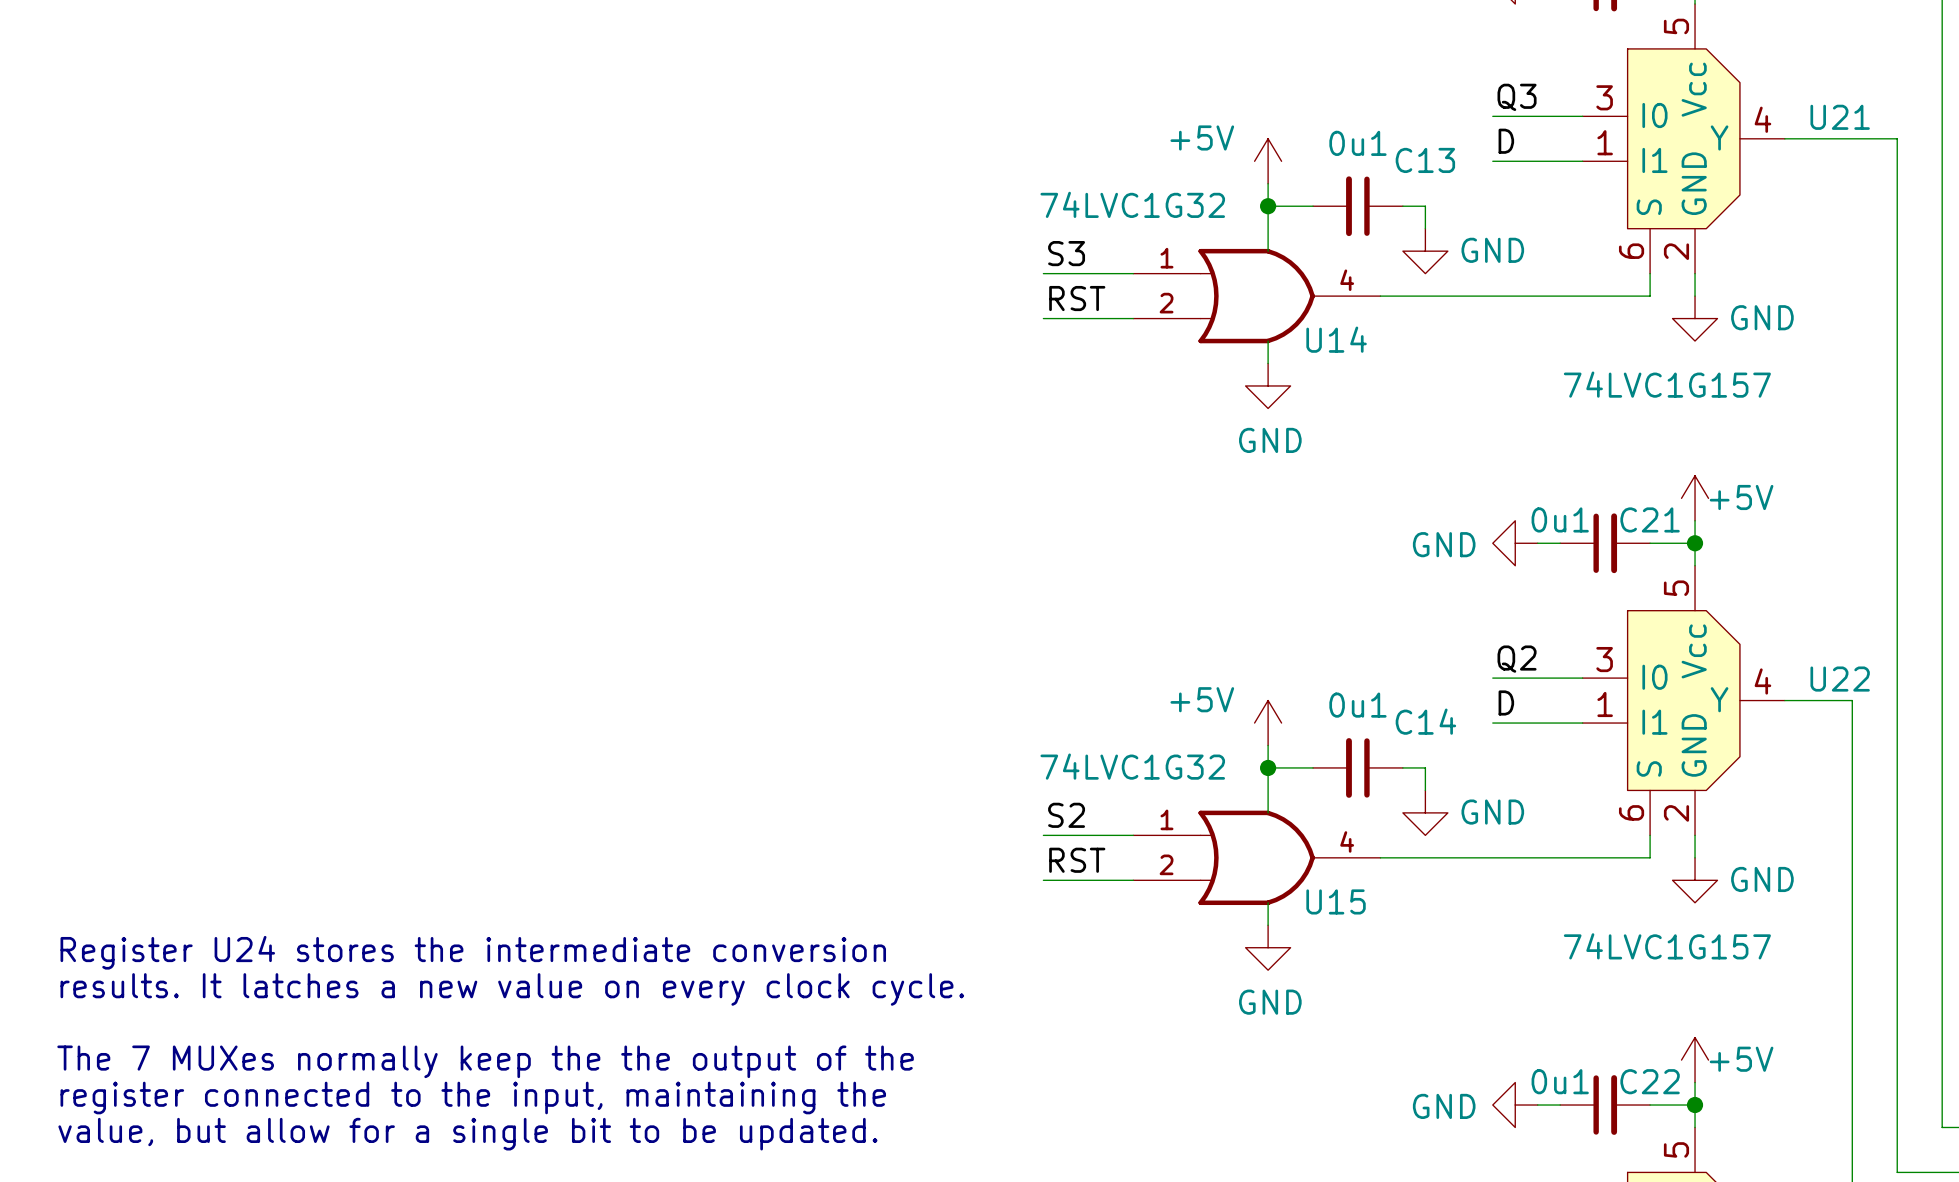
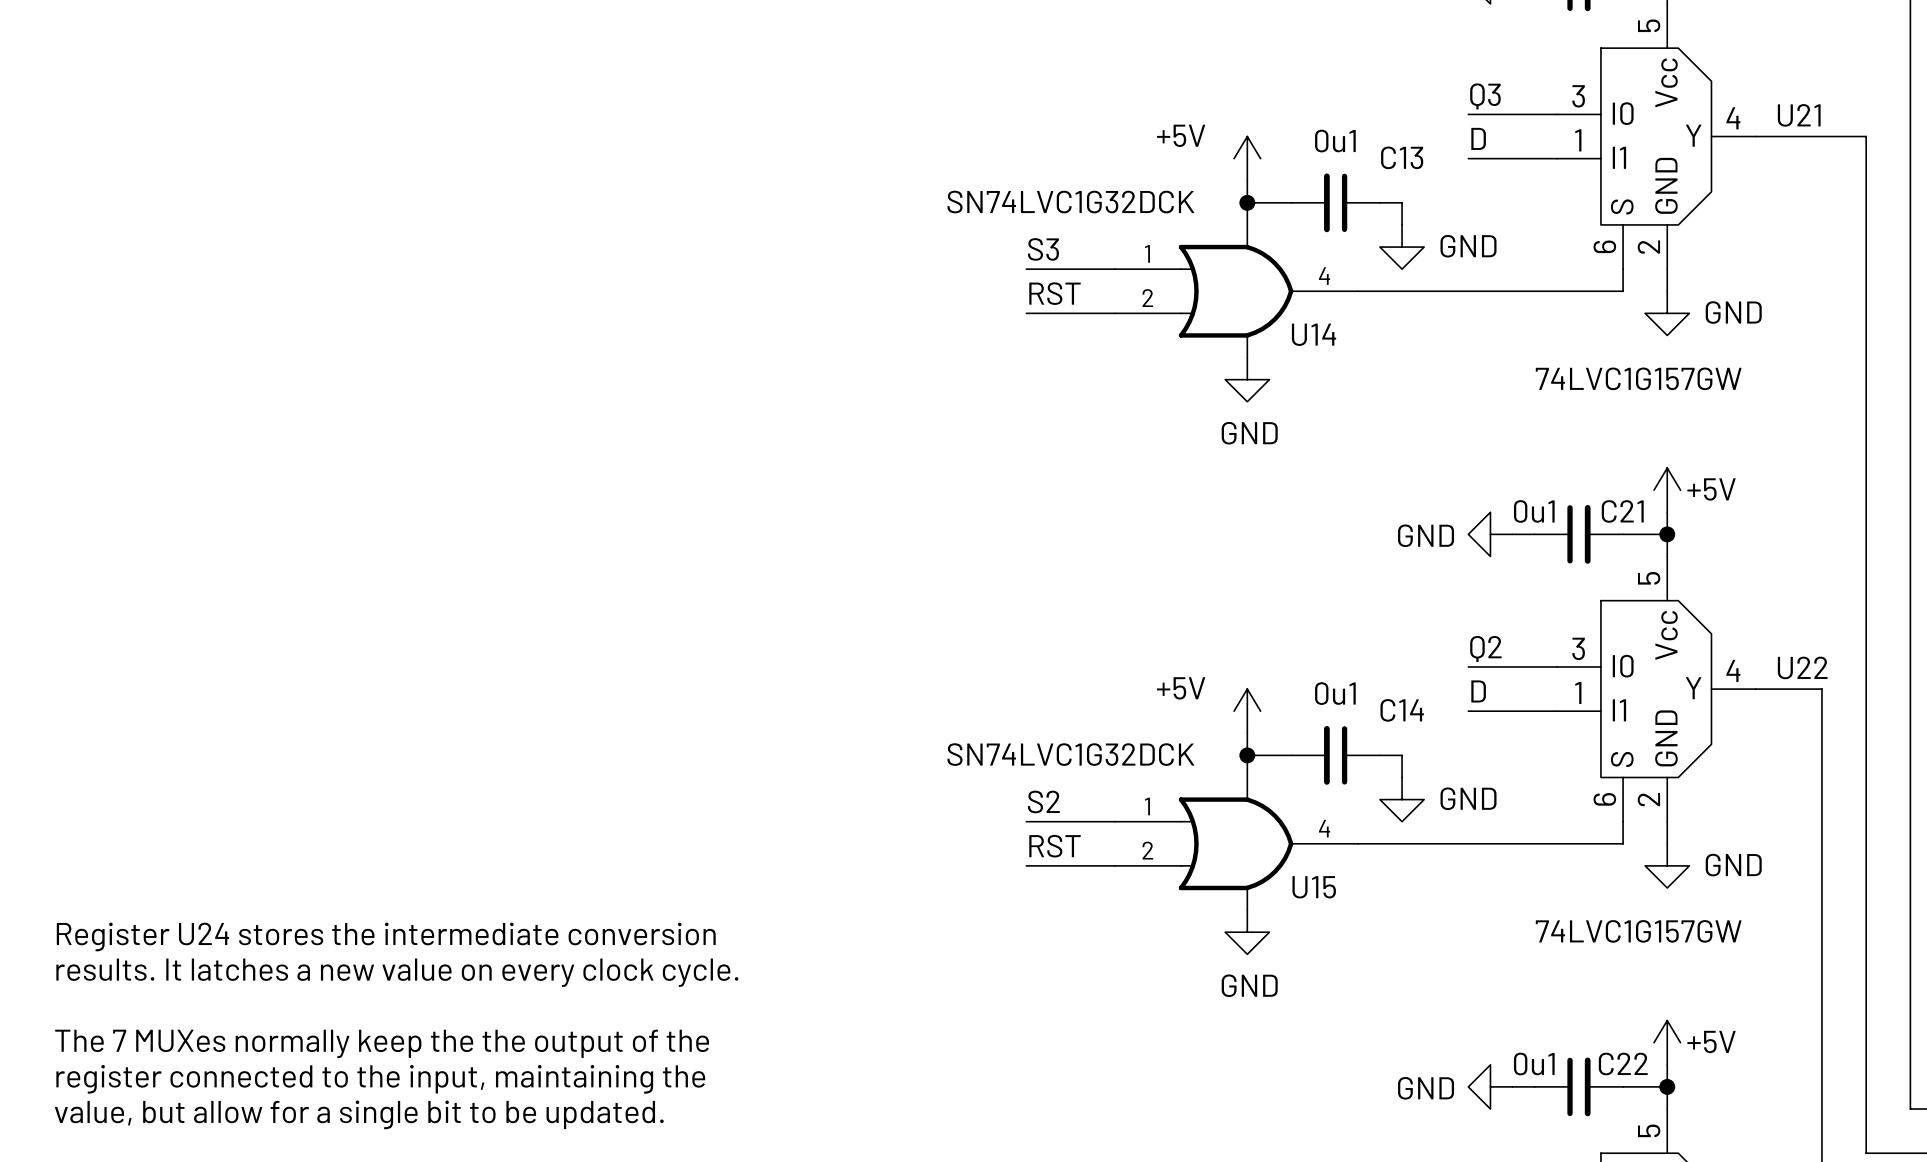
U14 value: 74LVC1G32 (1132, 204) -> SN74LVC1G32DCK (1070, 202)
U21 value: 74LVC1G157 (1667, 384) -> 74LVC1G157GW (1638, 378)
U15 value: 74LVC1G32 (1132, 766) -> SN74LVC1G32DCK (1070, 754)
U22 value: 74LVC1G157 (1667, 946) -> 74LVC1G157GW (1638, 931)

